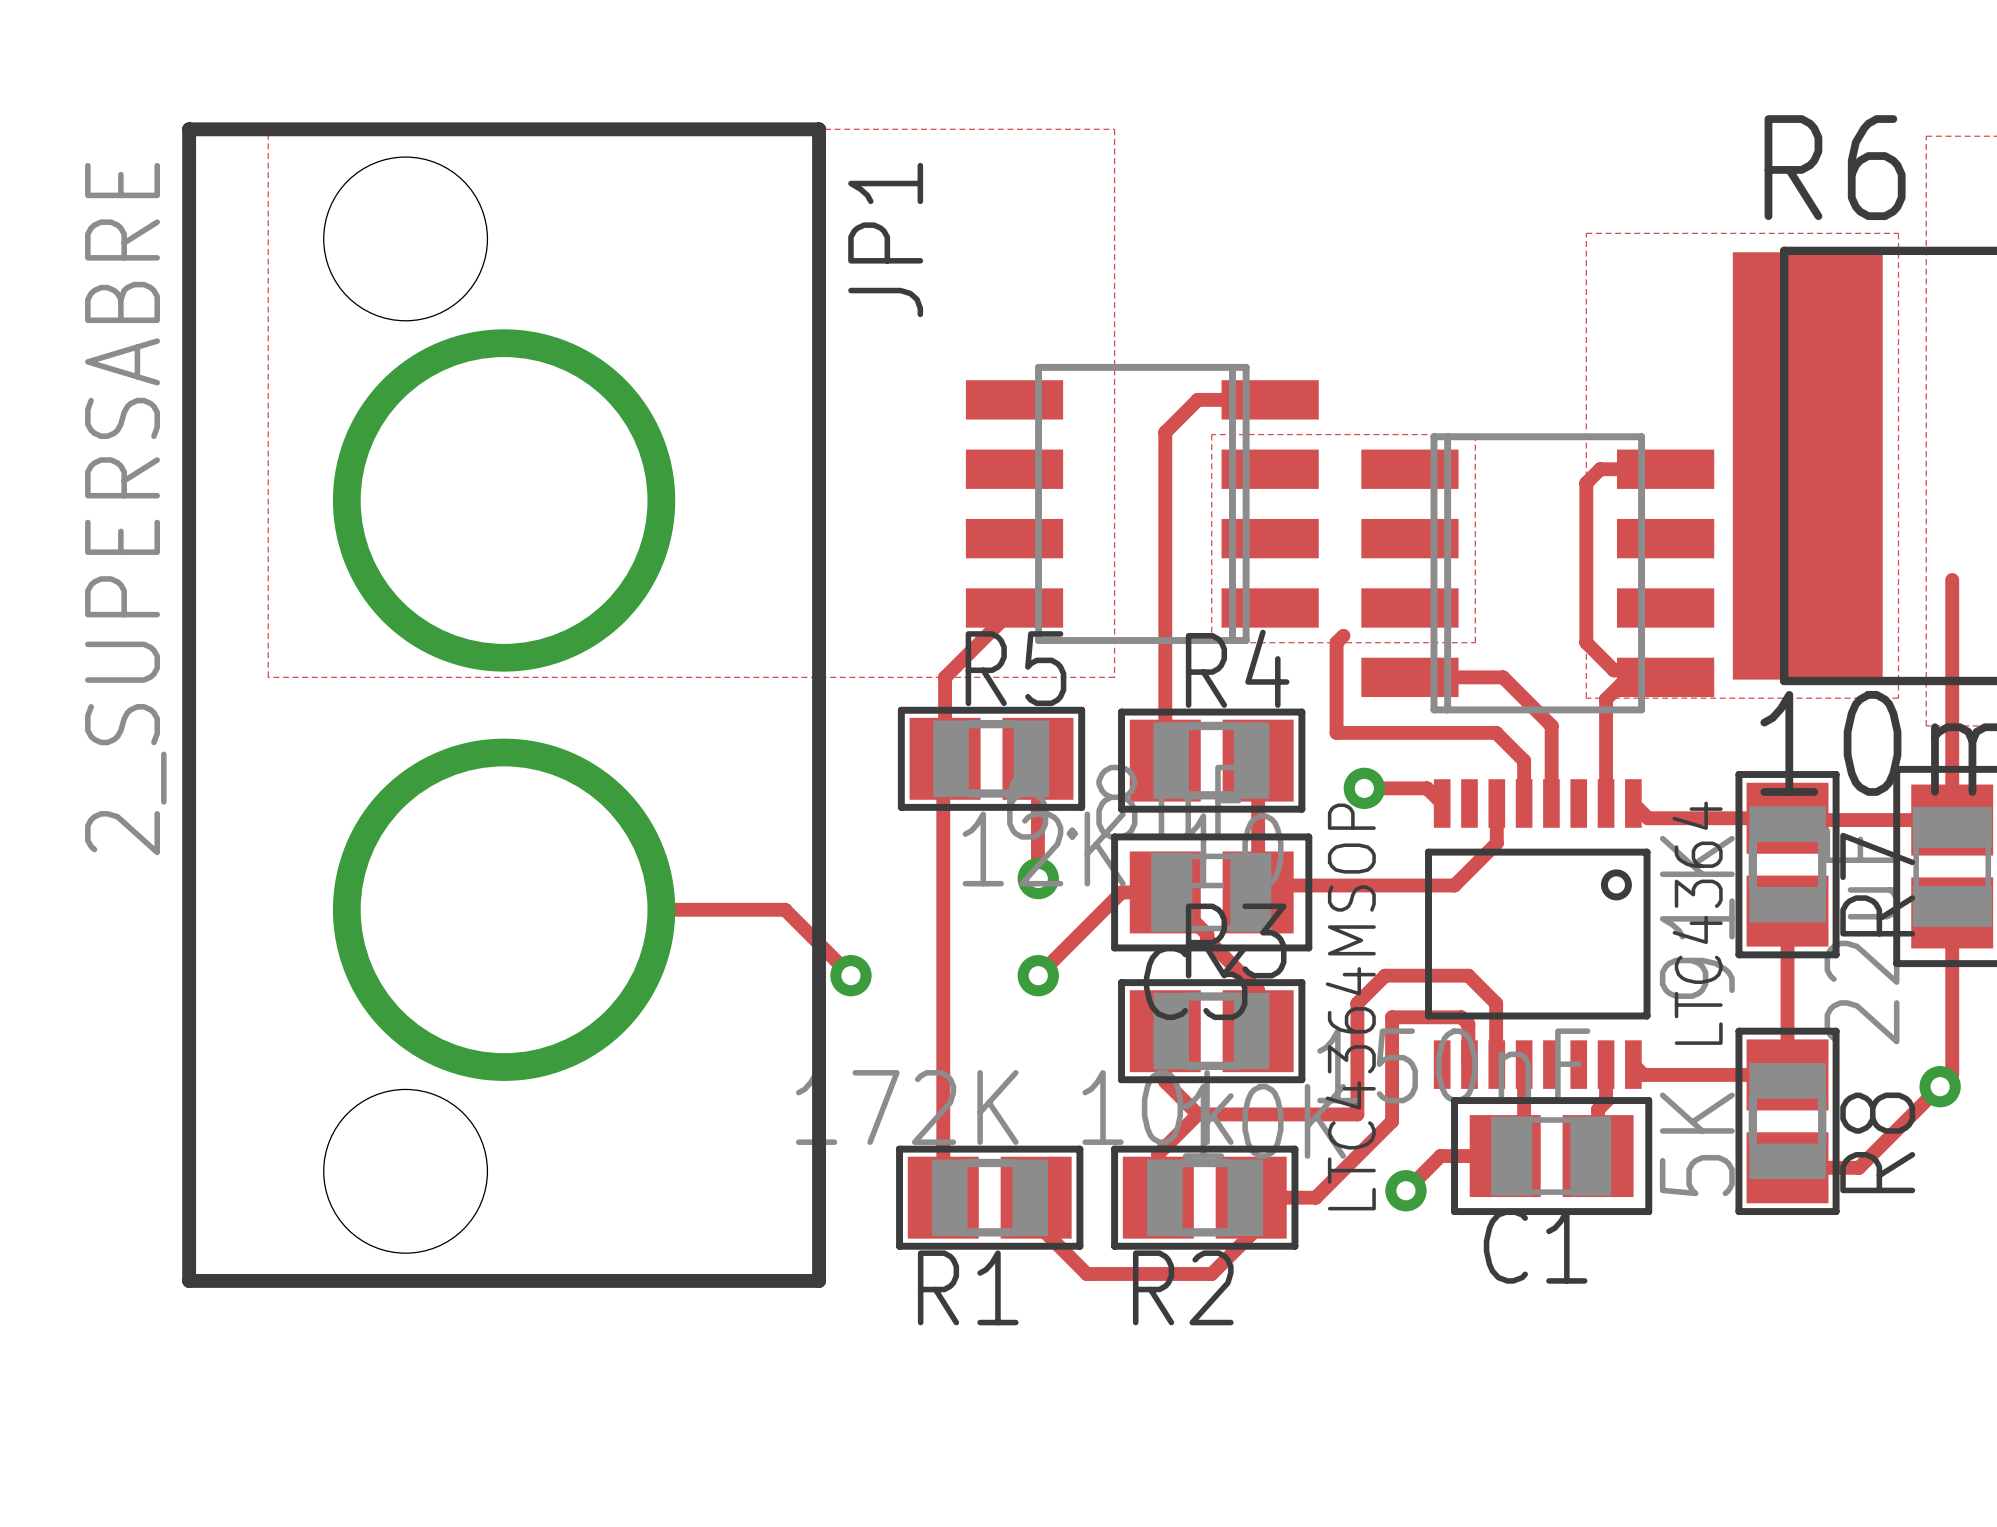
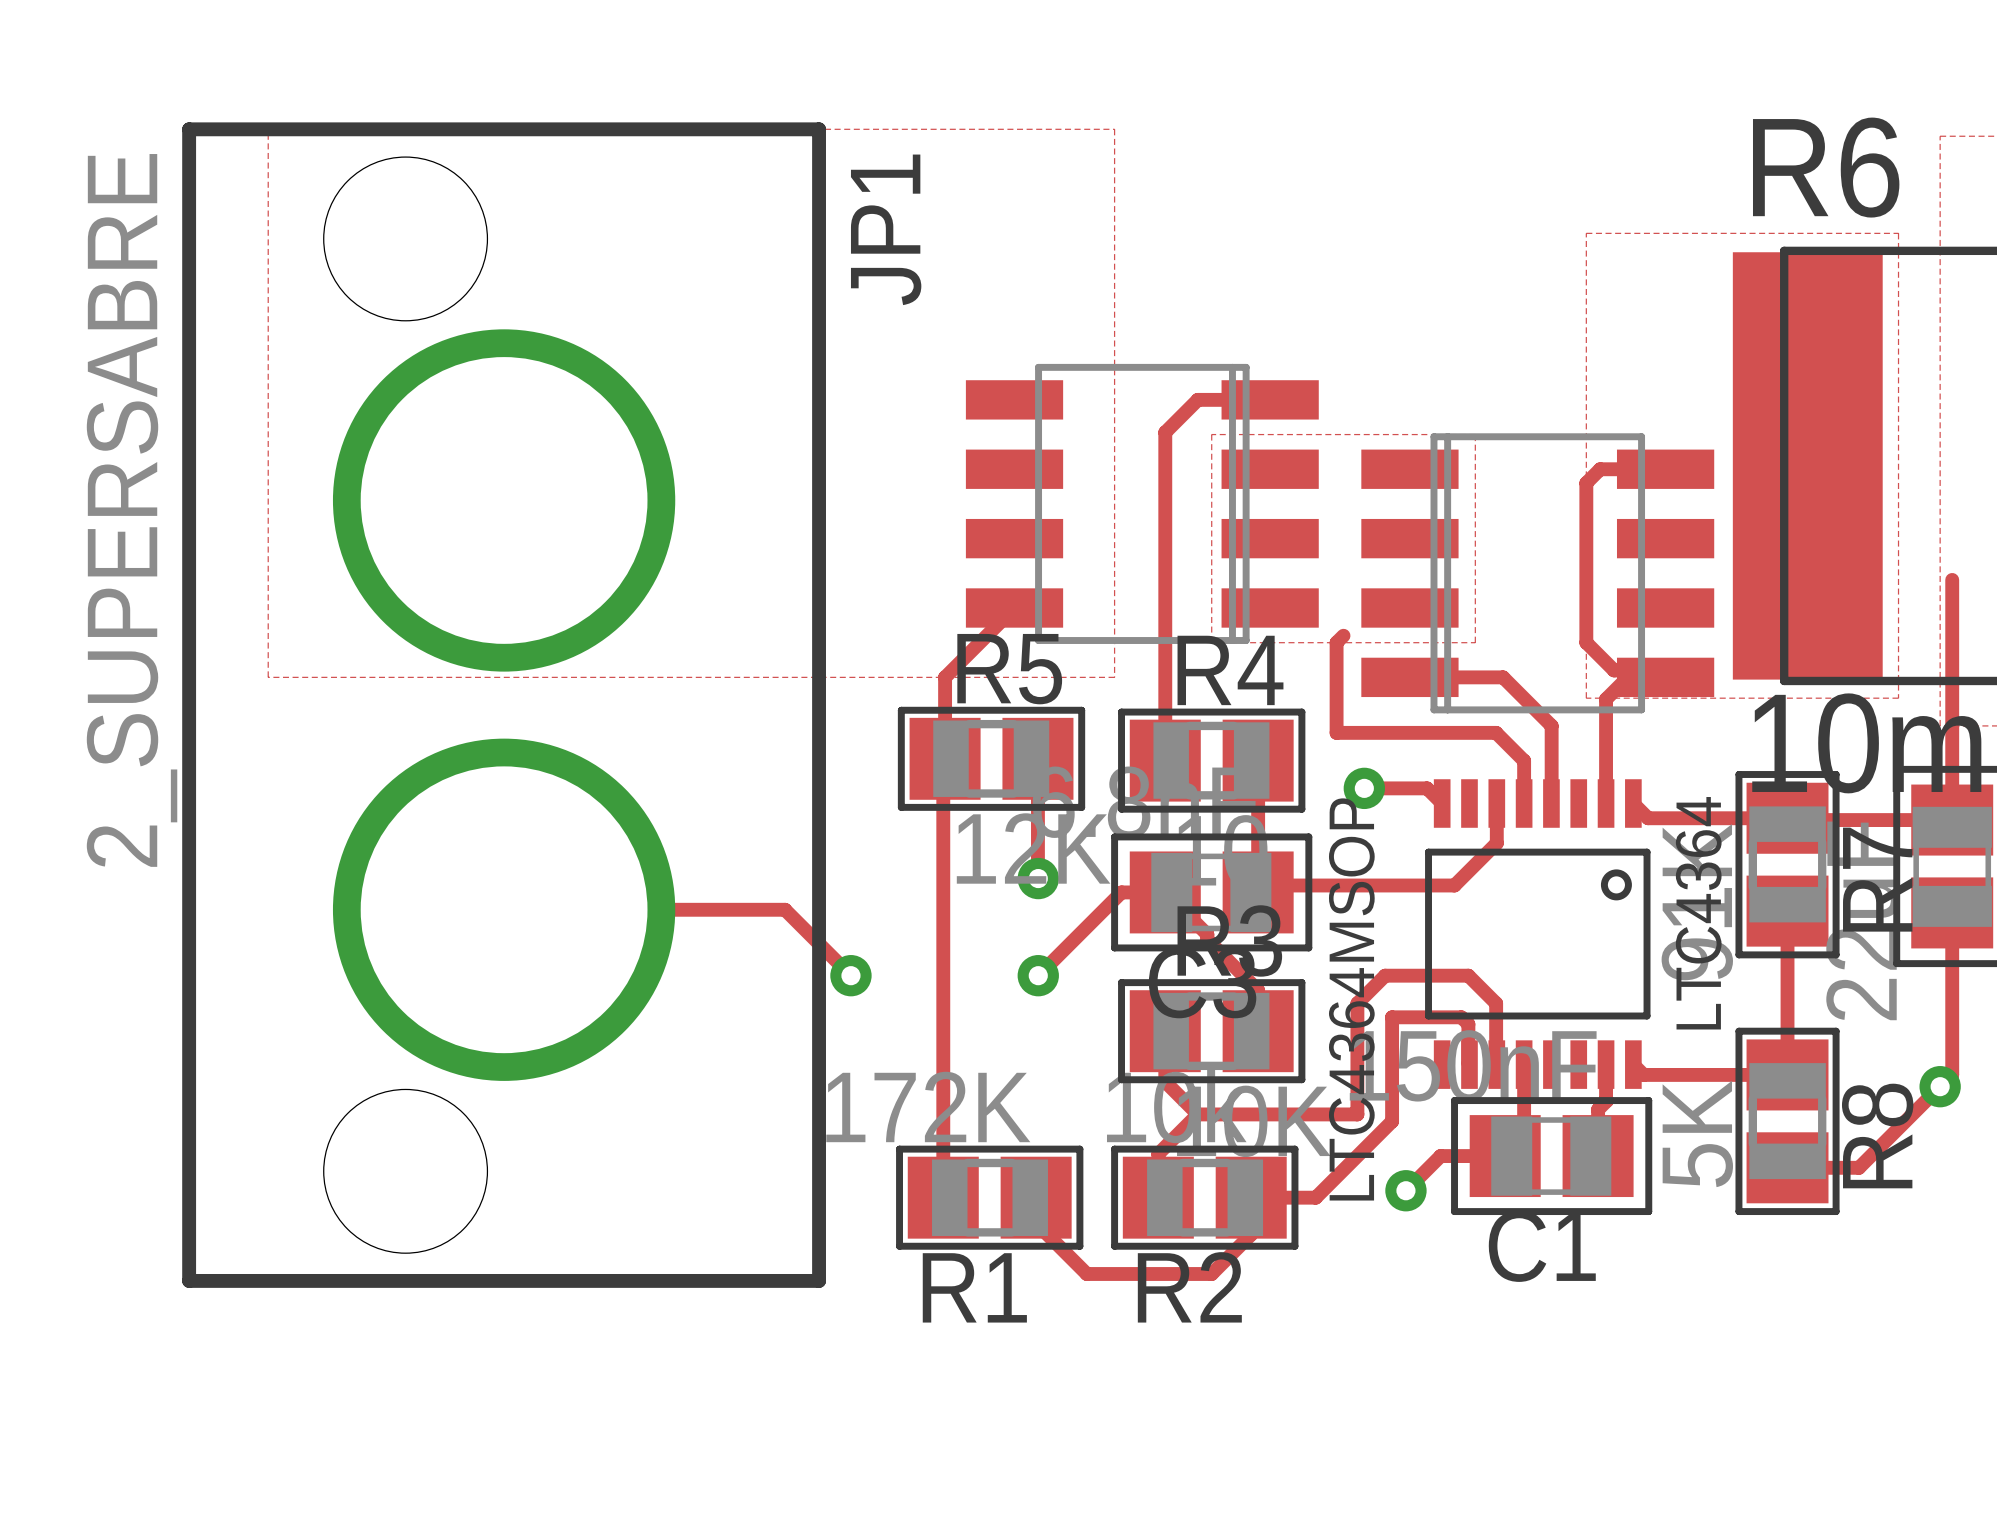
zone outline: (1940, 136) (1926, 136) (1926, 725) (1940, 725) -> (1940, 136) (1940, 725)

